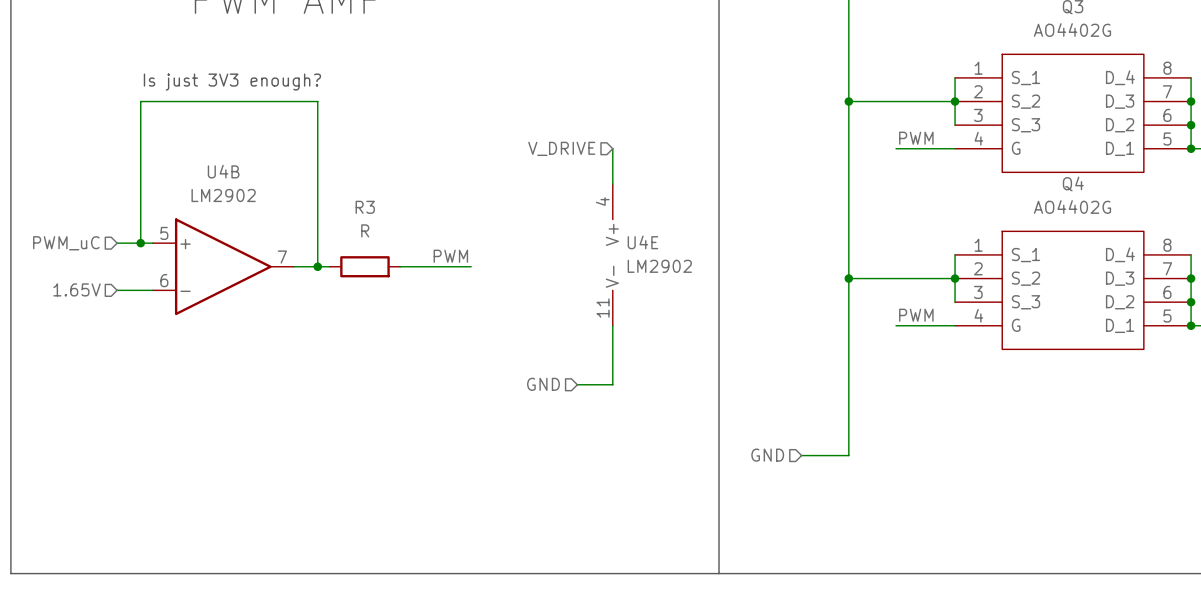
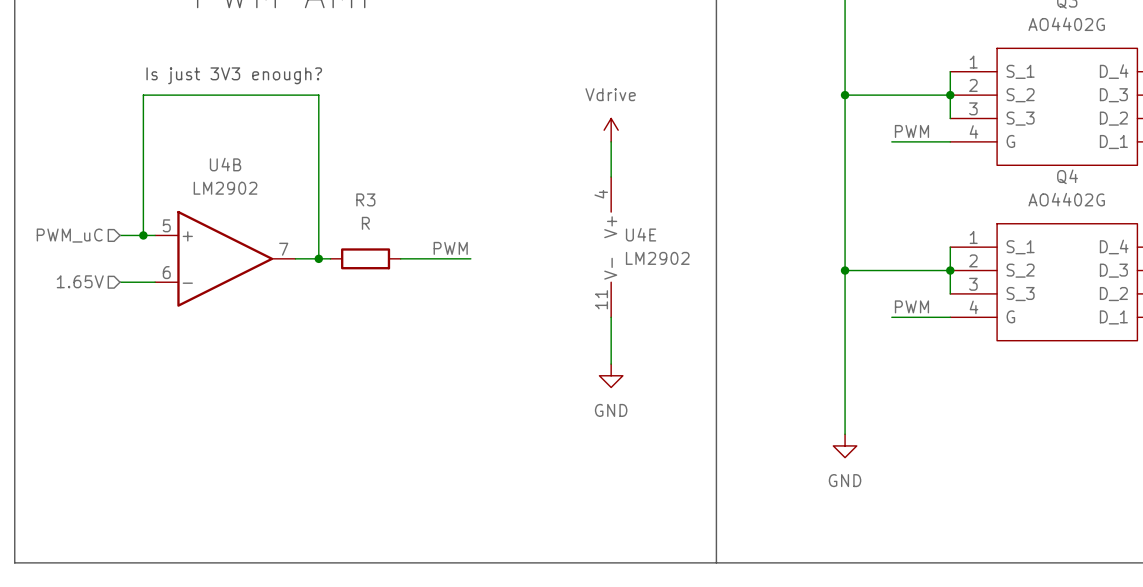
power symbol: none -> Vdrive (611, 130)
hierarchical label: V_DRIVE (561, 148) -> none
wire: (612, 372) (612, 384) (577, 384) -> none
hierarchical label: GND (543, 384) -> none
power symbol: none -> GND (611, 375)
wire: (848, 443) (848, 455) (801, 455) -> none
hierarchical label: GND (767, 455) -> none
power symbol: none -> GND (845, 445)

